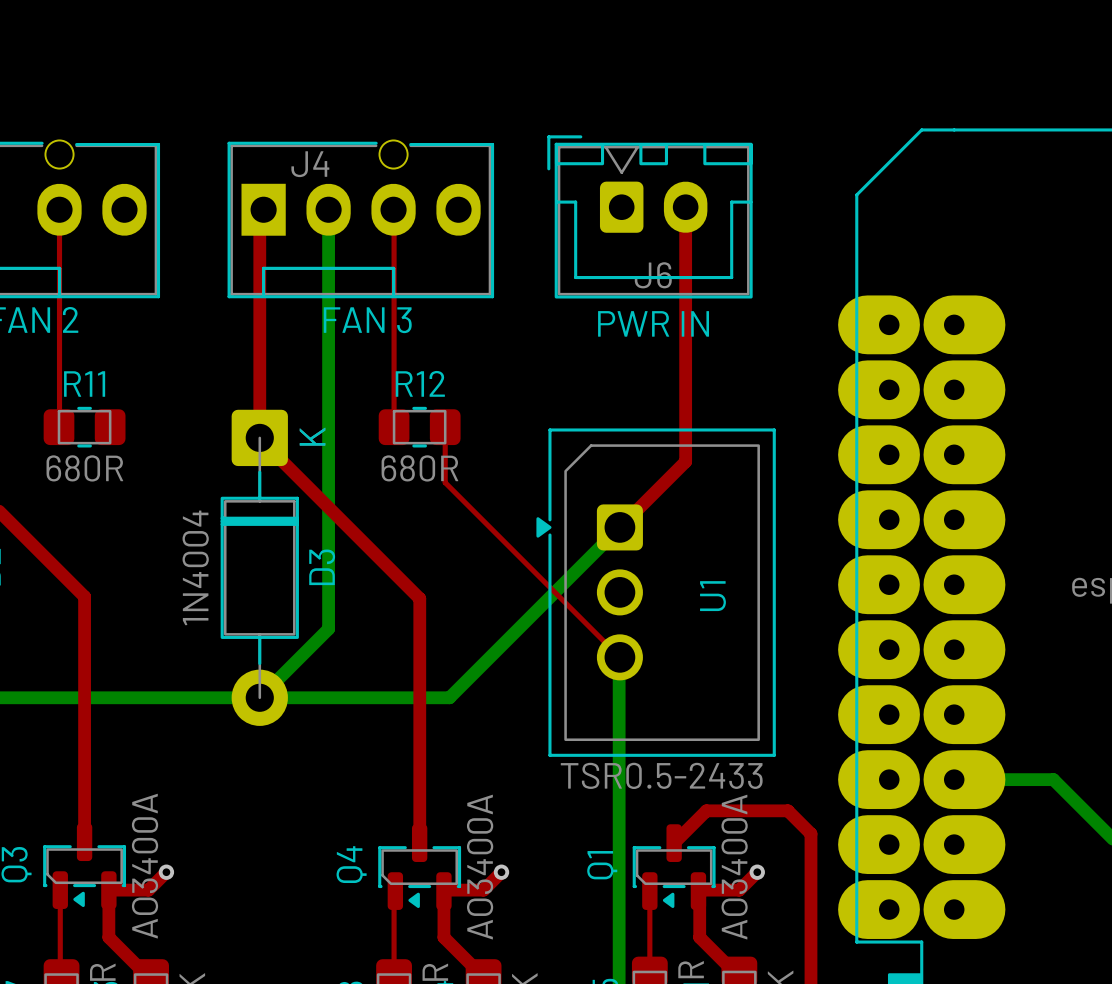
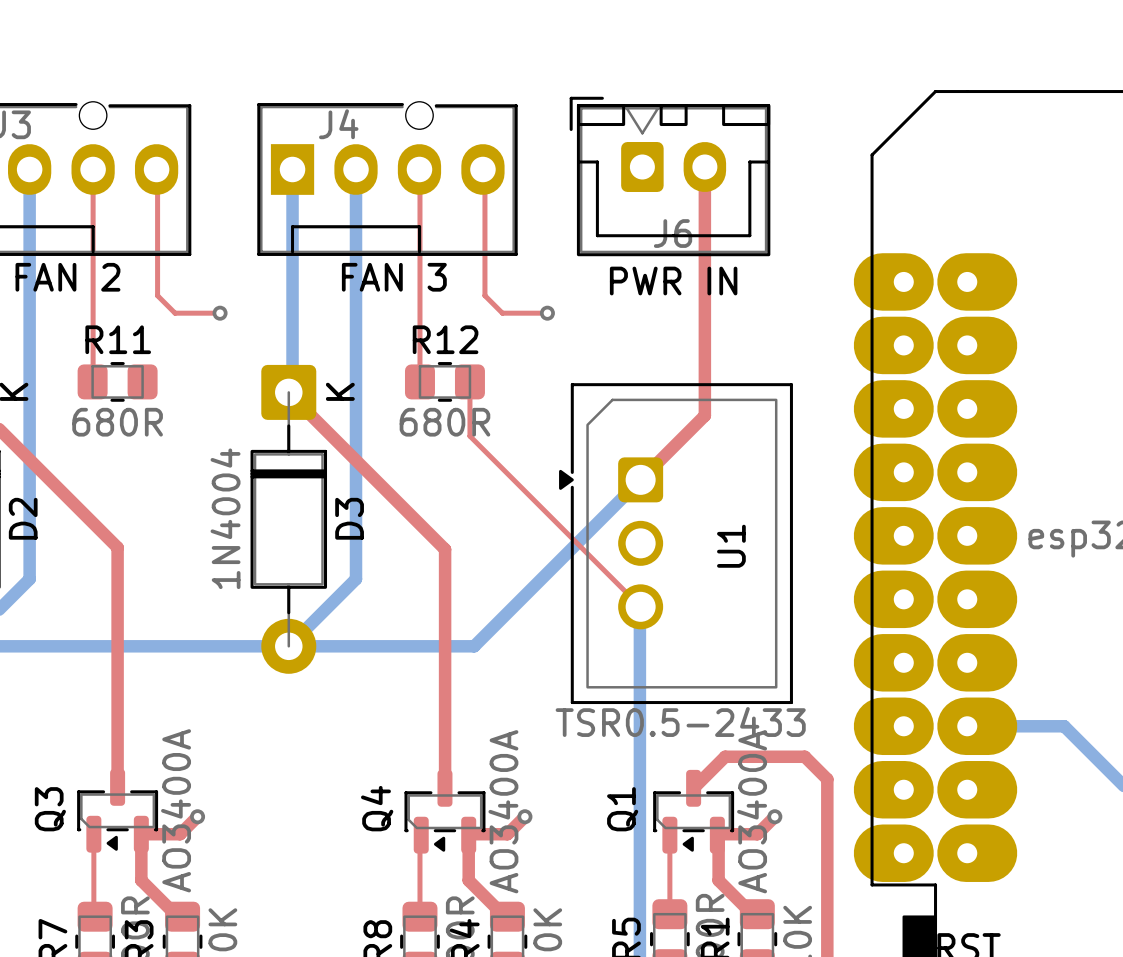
top track: none -> (157, 168) (157, 295) (175, 313) (220, 313)
top track: none -> (484, 168) (484, 295) (502, 313) (547, 313)
bottom track: none -> (292, 169) (292, 388) (288, 392)
top track: (259, 213) (259, 437) -> none
via: none -> (220, 313)
via: none -> (547, 313)

